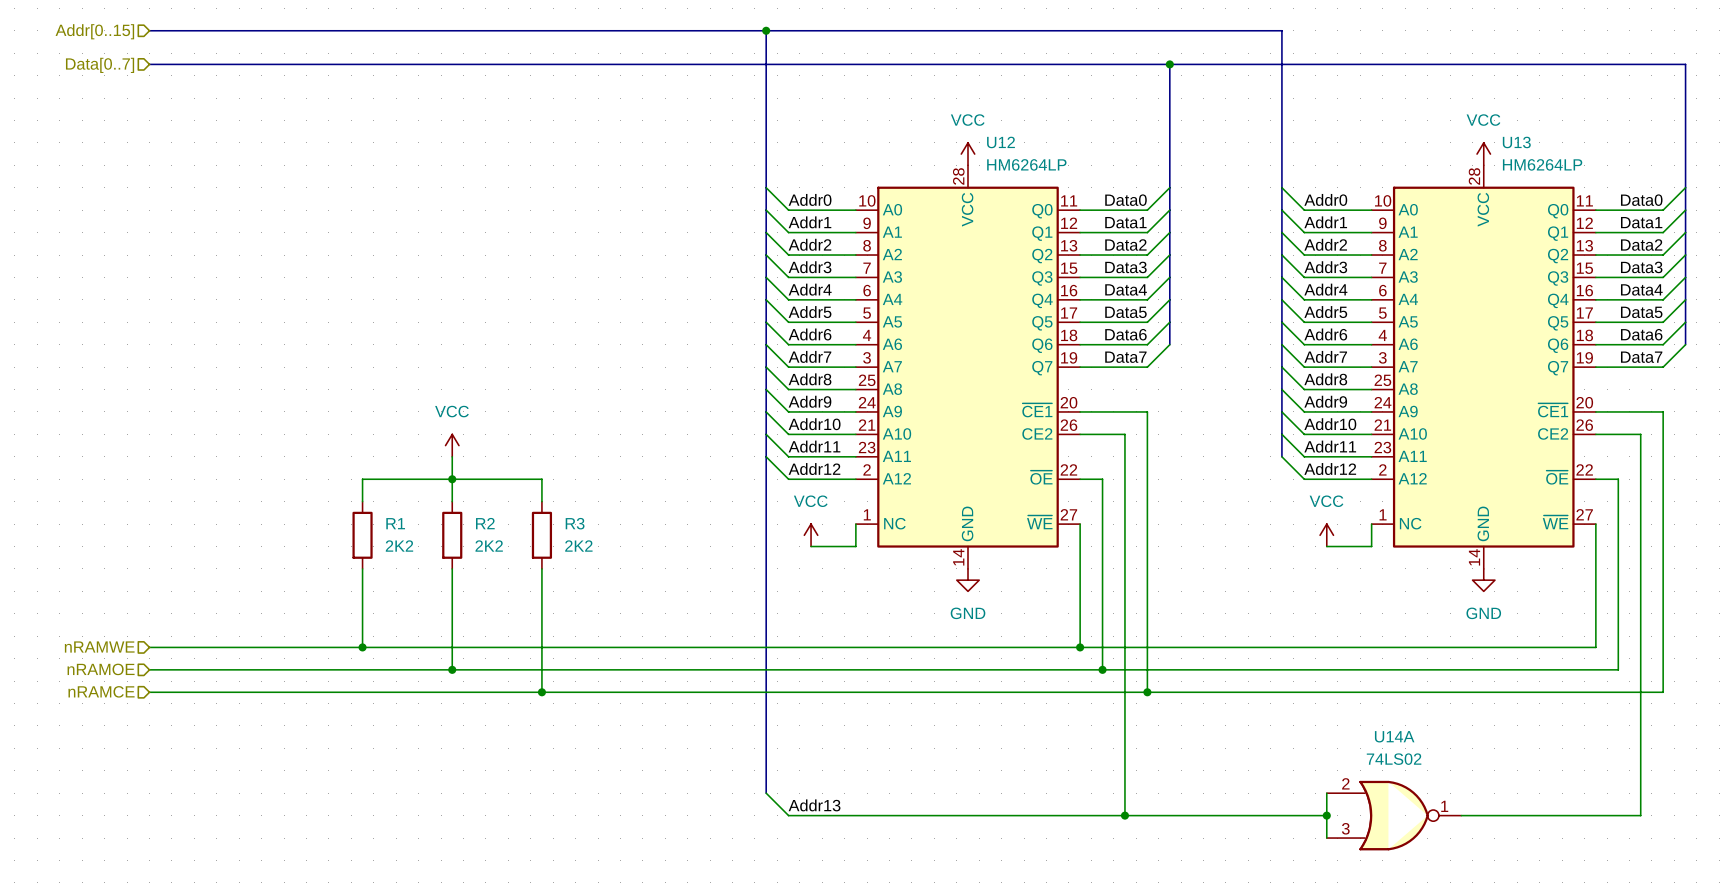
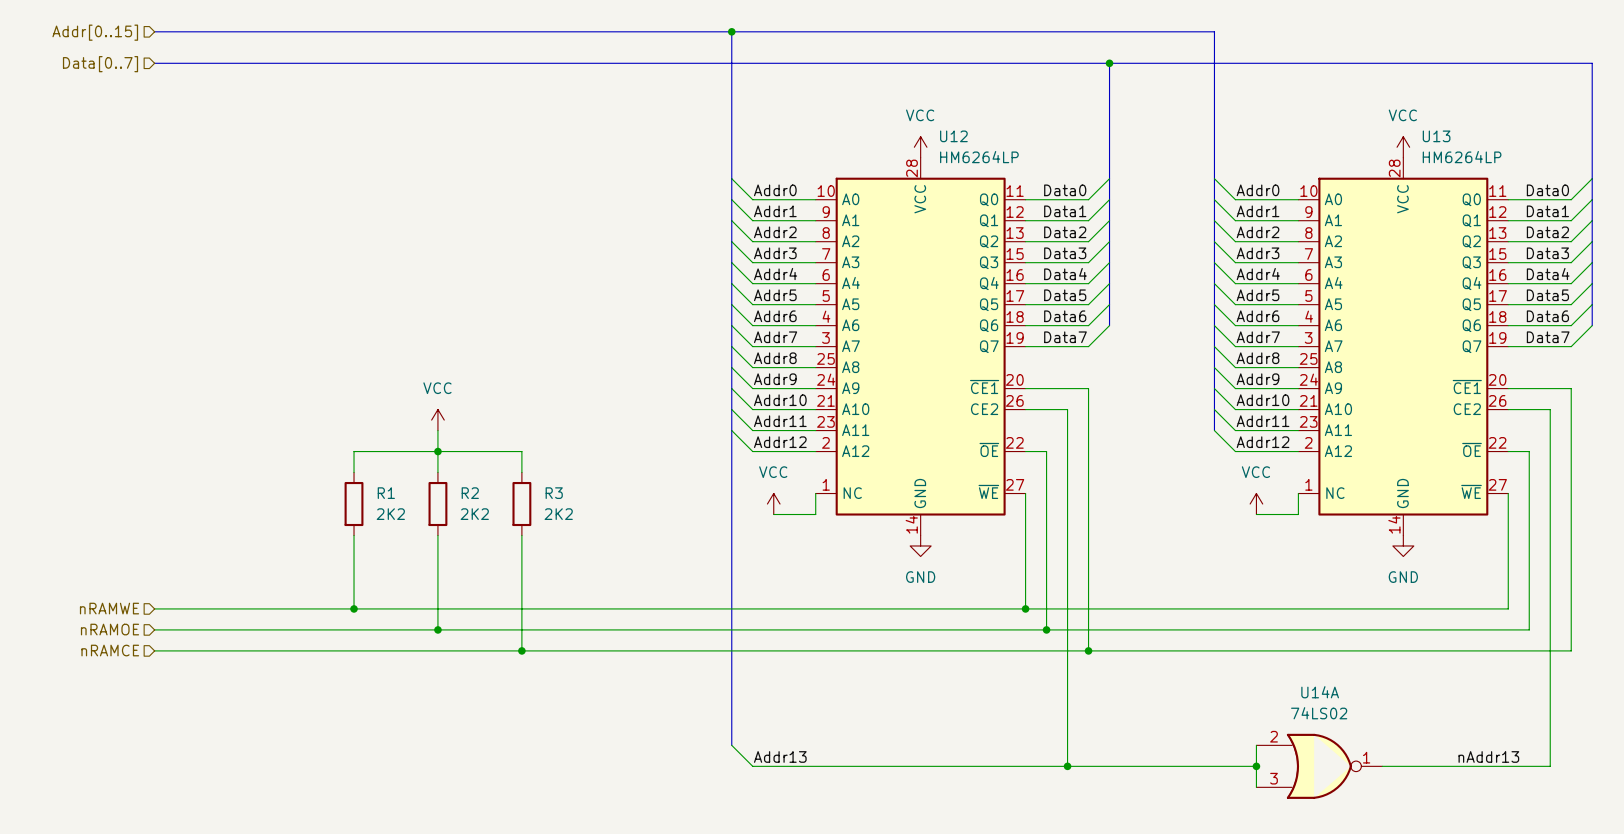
label: none -> nAddr13 (1488, 756)

